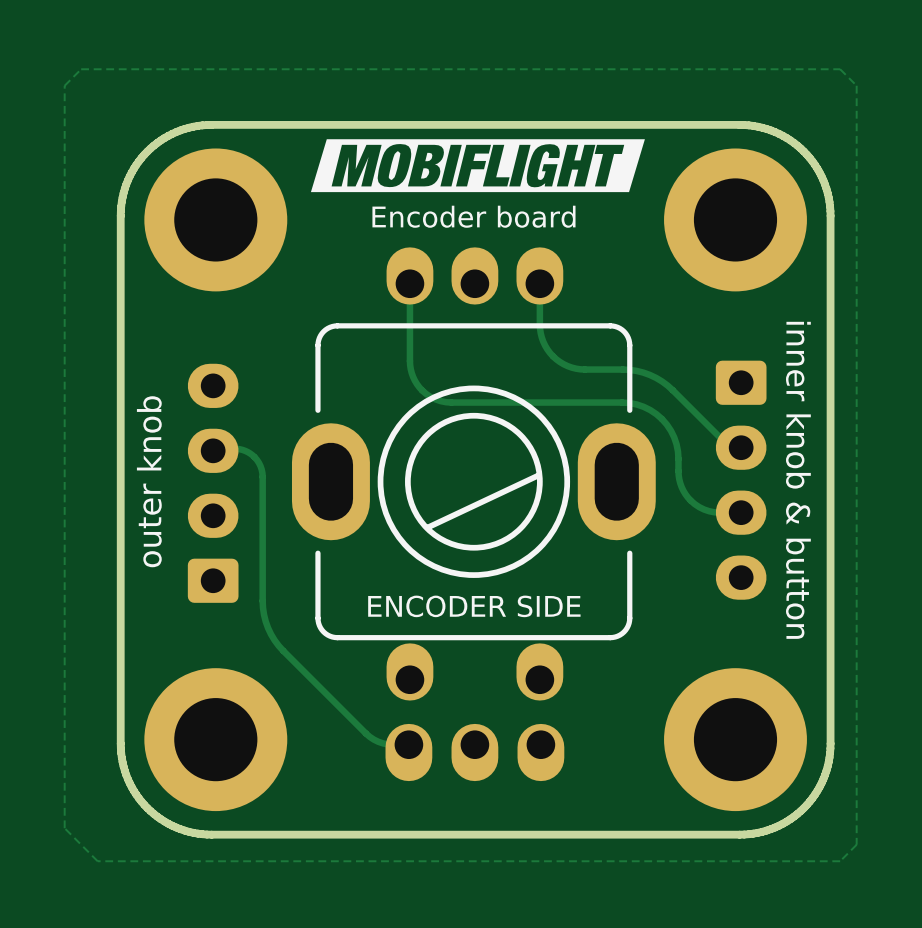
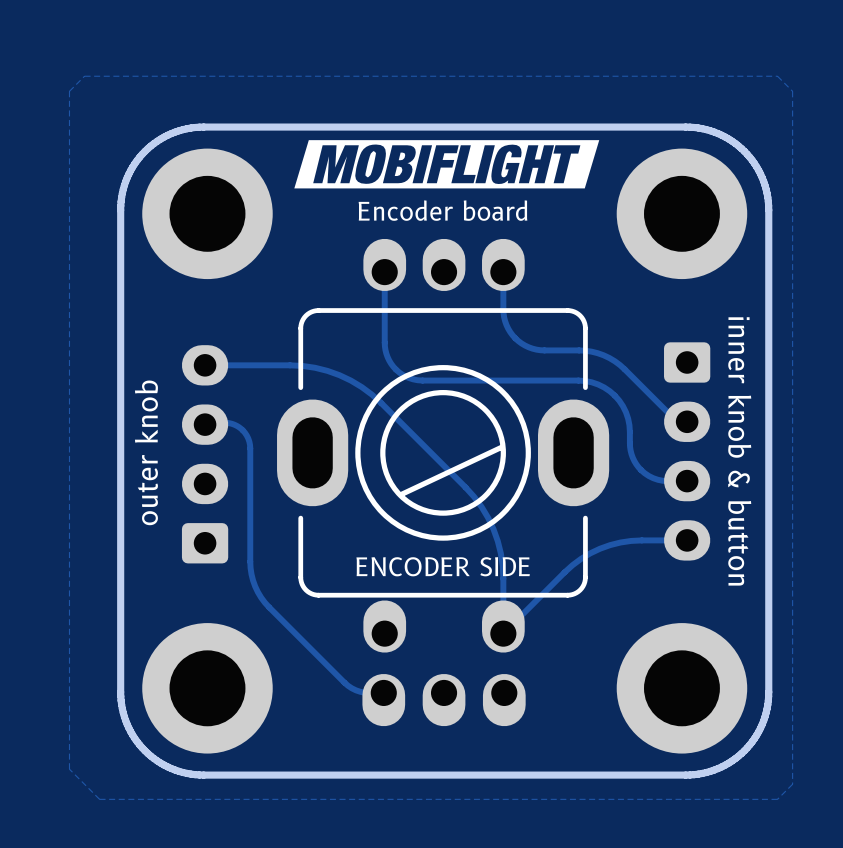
track: none -> (205, 365) (290, 365) (315, 367) (339, 375) (371, 394) (465, 487) (488, 517) (497, 541) (502, 566) (503, 633) (564, 572) (590, 553) (610, 545) (631, 540) (687, 540)

